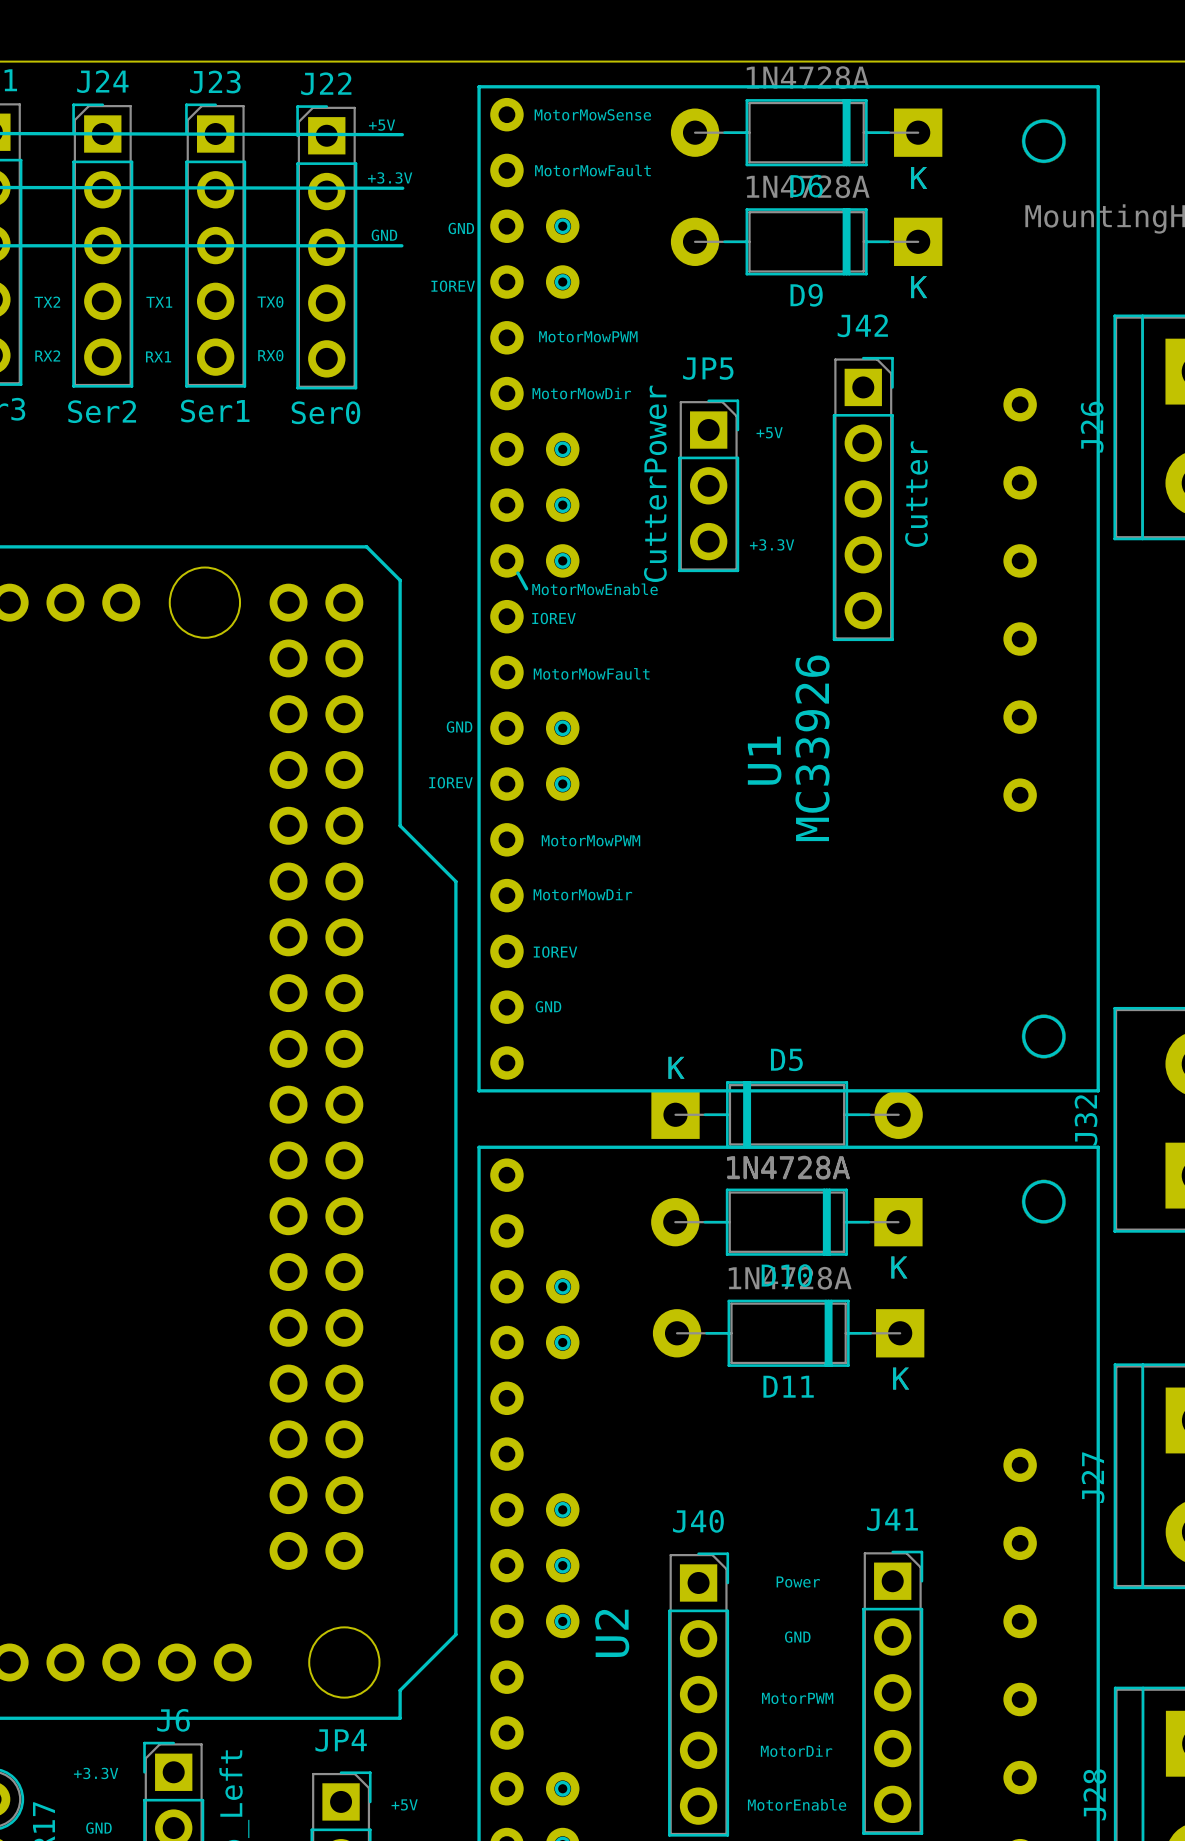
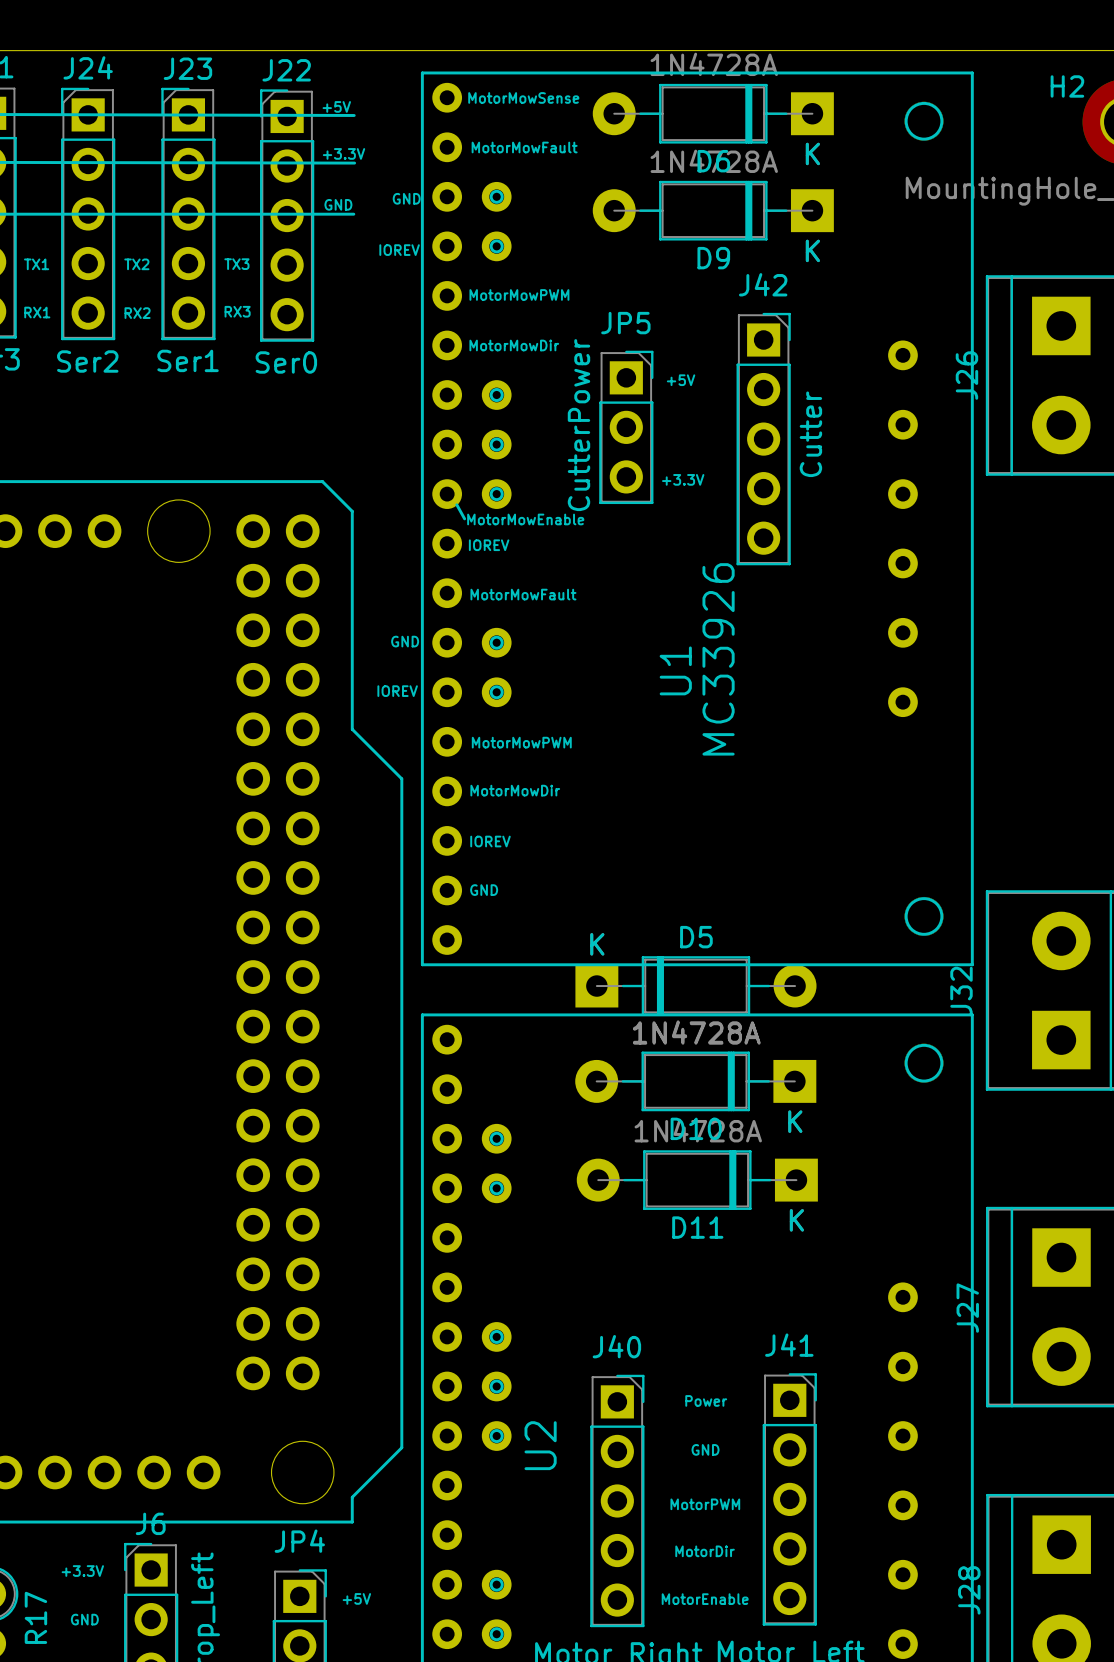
text: TX2 (47, 302) -> TX1 (36, 264)
text: TX1 (159, 302) -> TX2 (136, 264)
text: TX0 (270, 302) -> TX3 (236, 264)
text: RX2 (47, 355) -> RX1 (37, 312)
text: RX0 (270, 355) -> RX3 (237, 311)
text: RX1 (158, 356) -> RX2 (137, 313)

